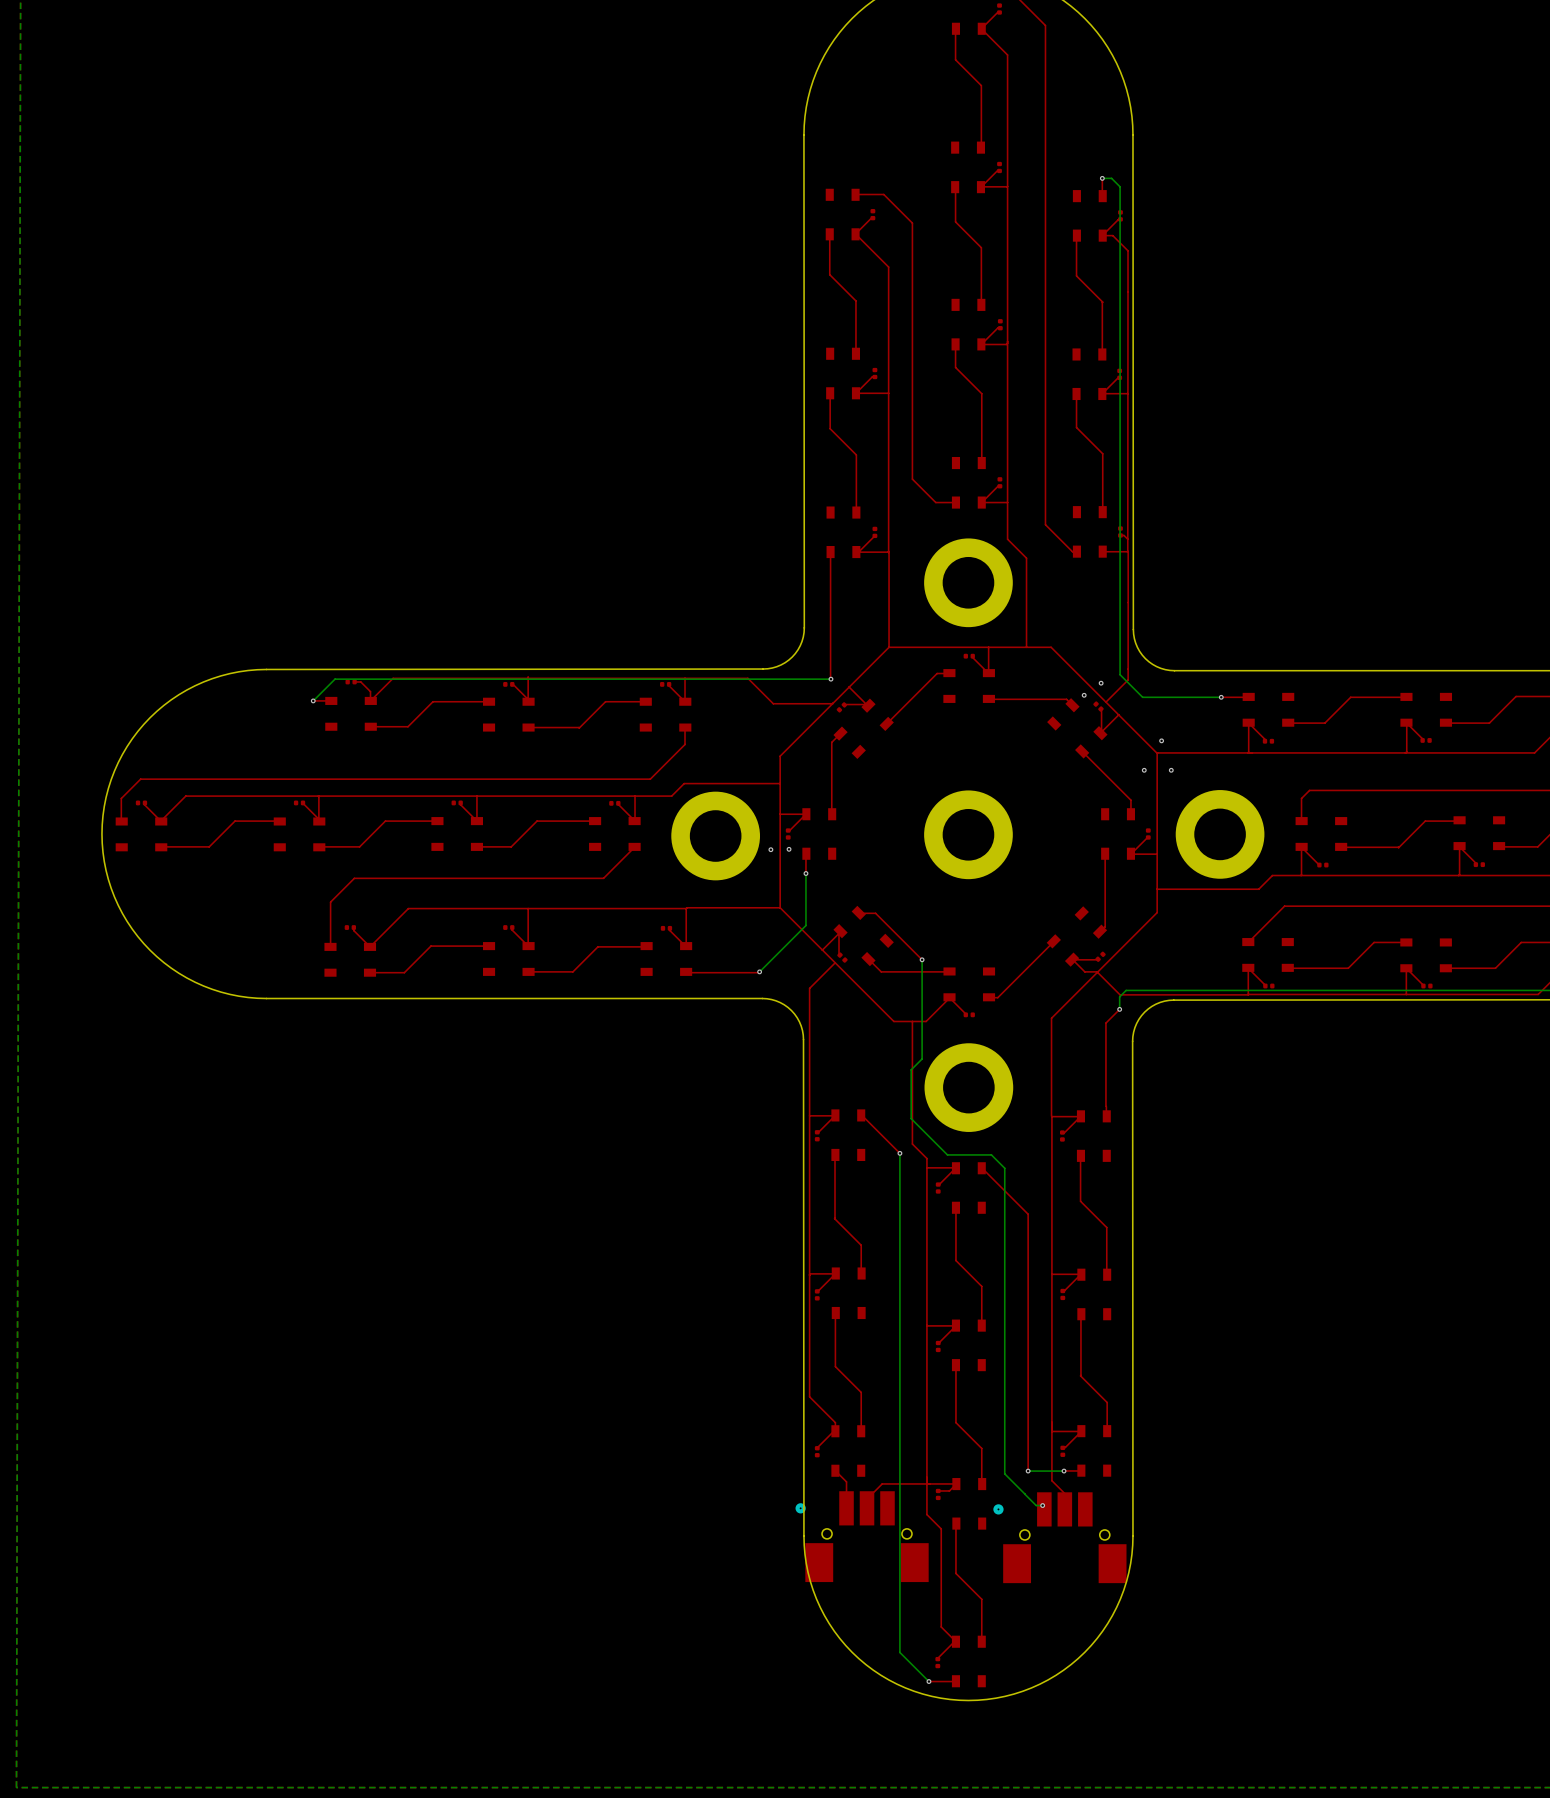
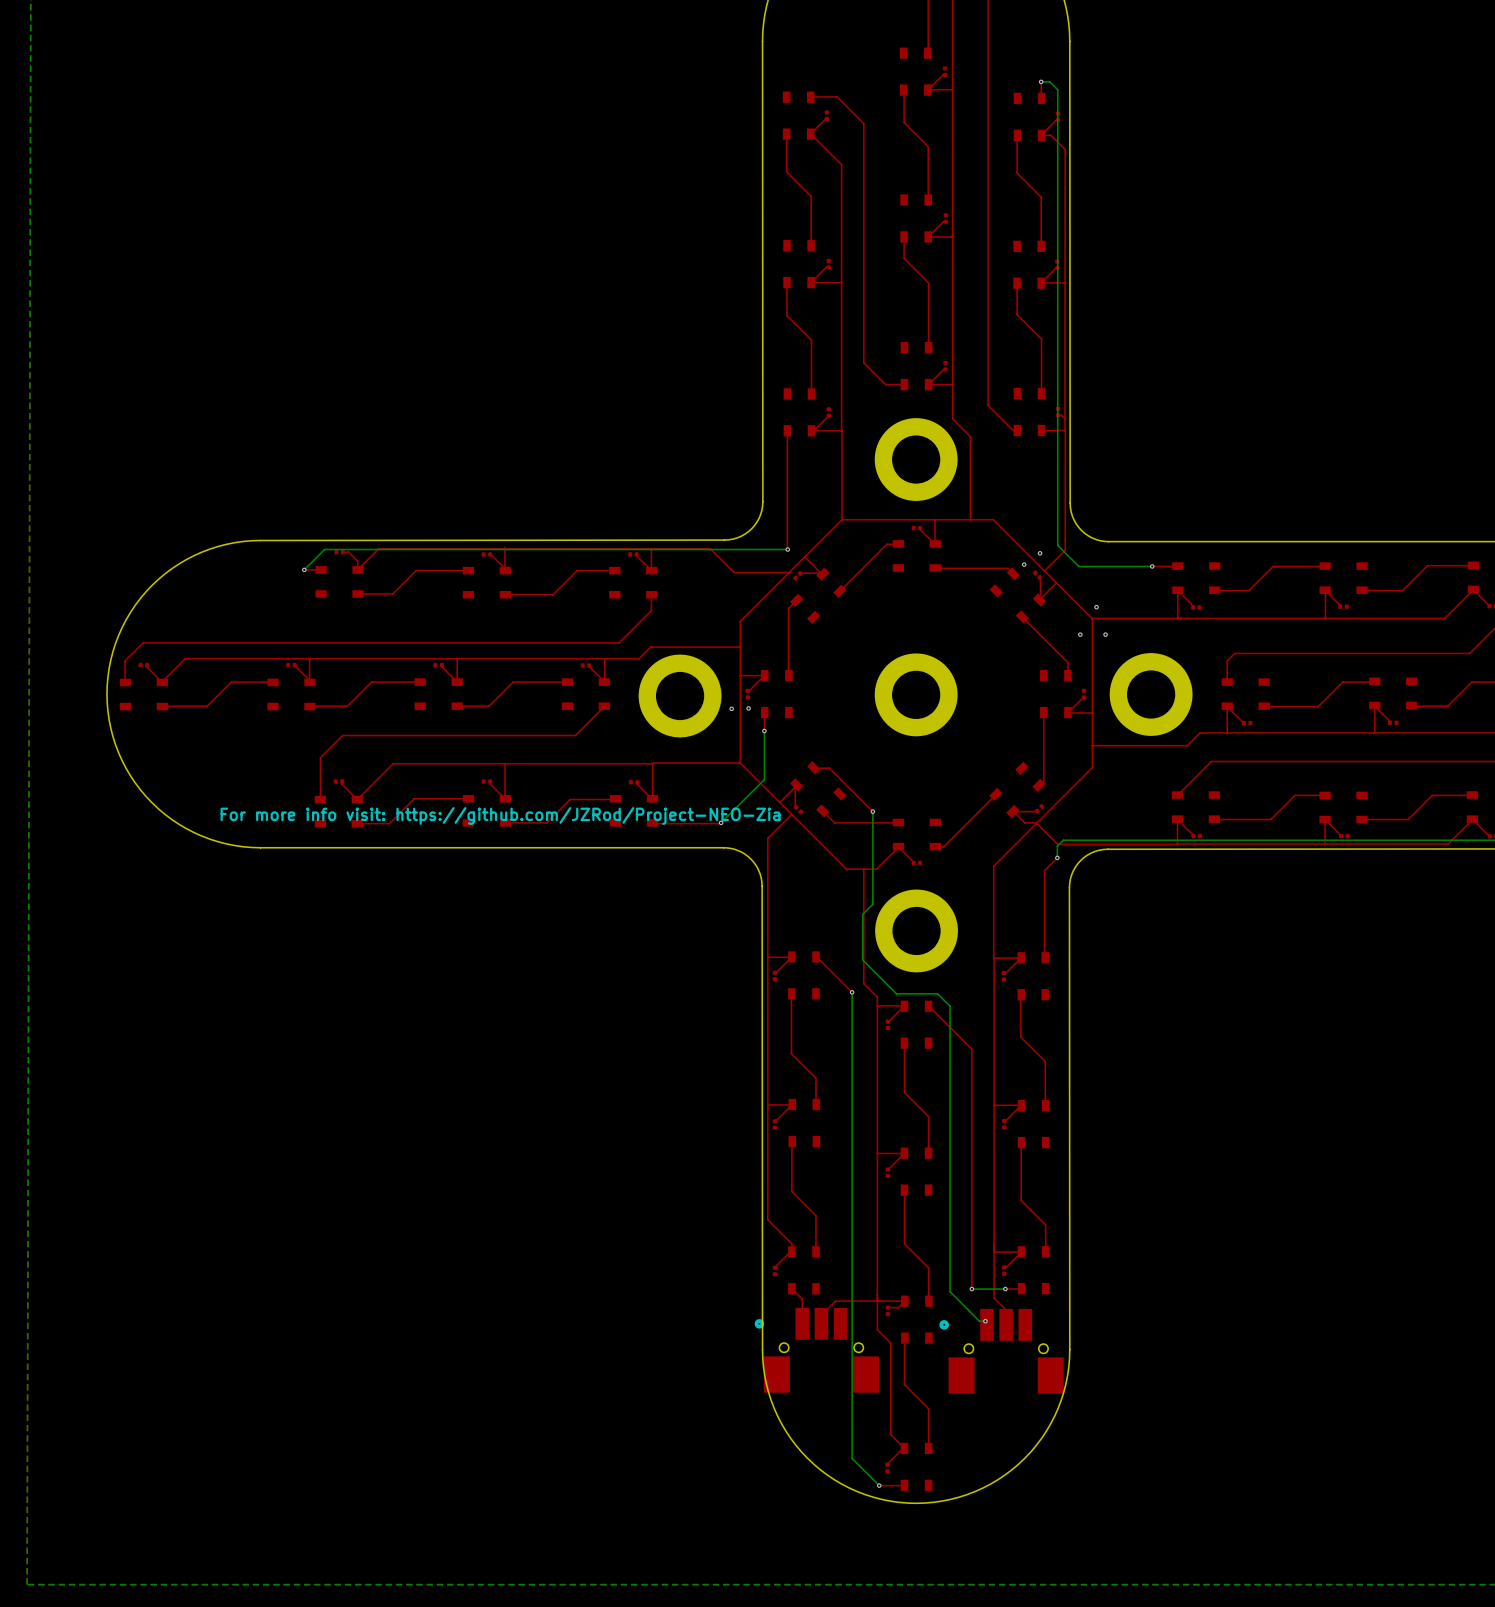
text: none -> For more info visit: https://github.com/JZRod/Project-NEO-Zia (500, 815)

